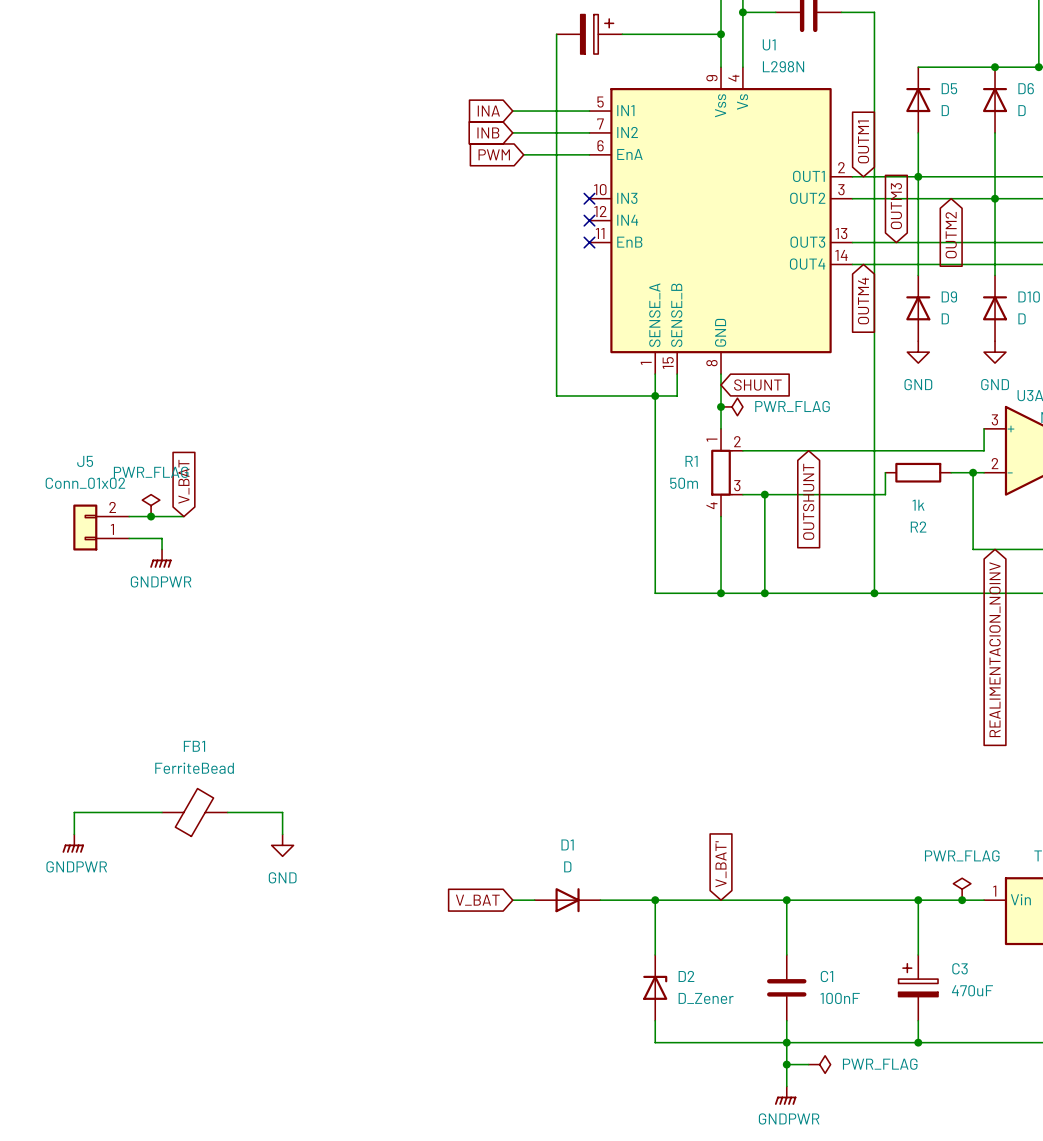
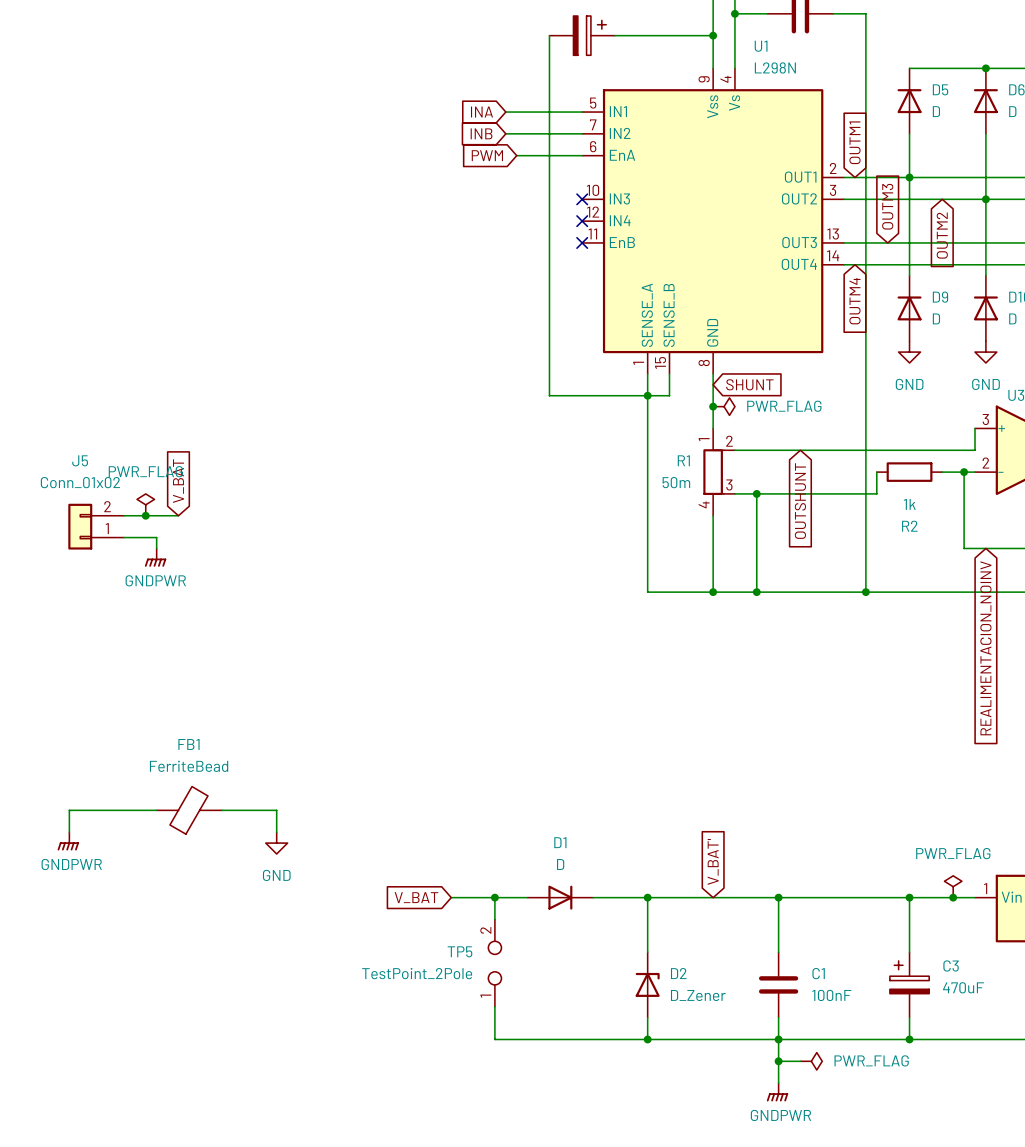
wire: none -> (451, 897) (505, 897)
global label position: V_BAT (477, 900) -> V_BAT (416, 897)
wire: none -> (494, 897) (494, 919)
junction: none -> (494, 897)
TP5: none -> TestPoint_2Pole (494, 963)
wire: none -> (494, 1006) (494, 1039) (647, 1039)
junction: none -> (647, 1039)

